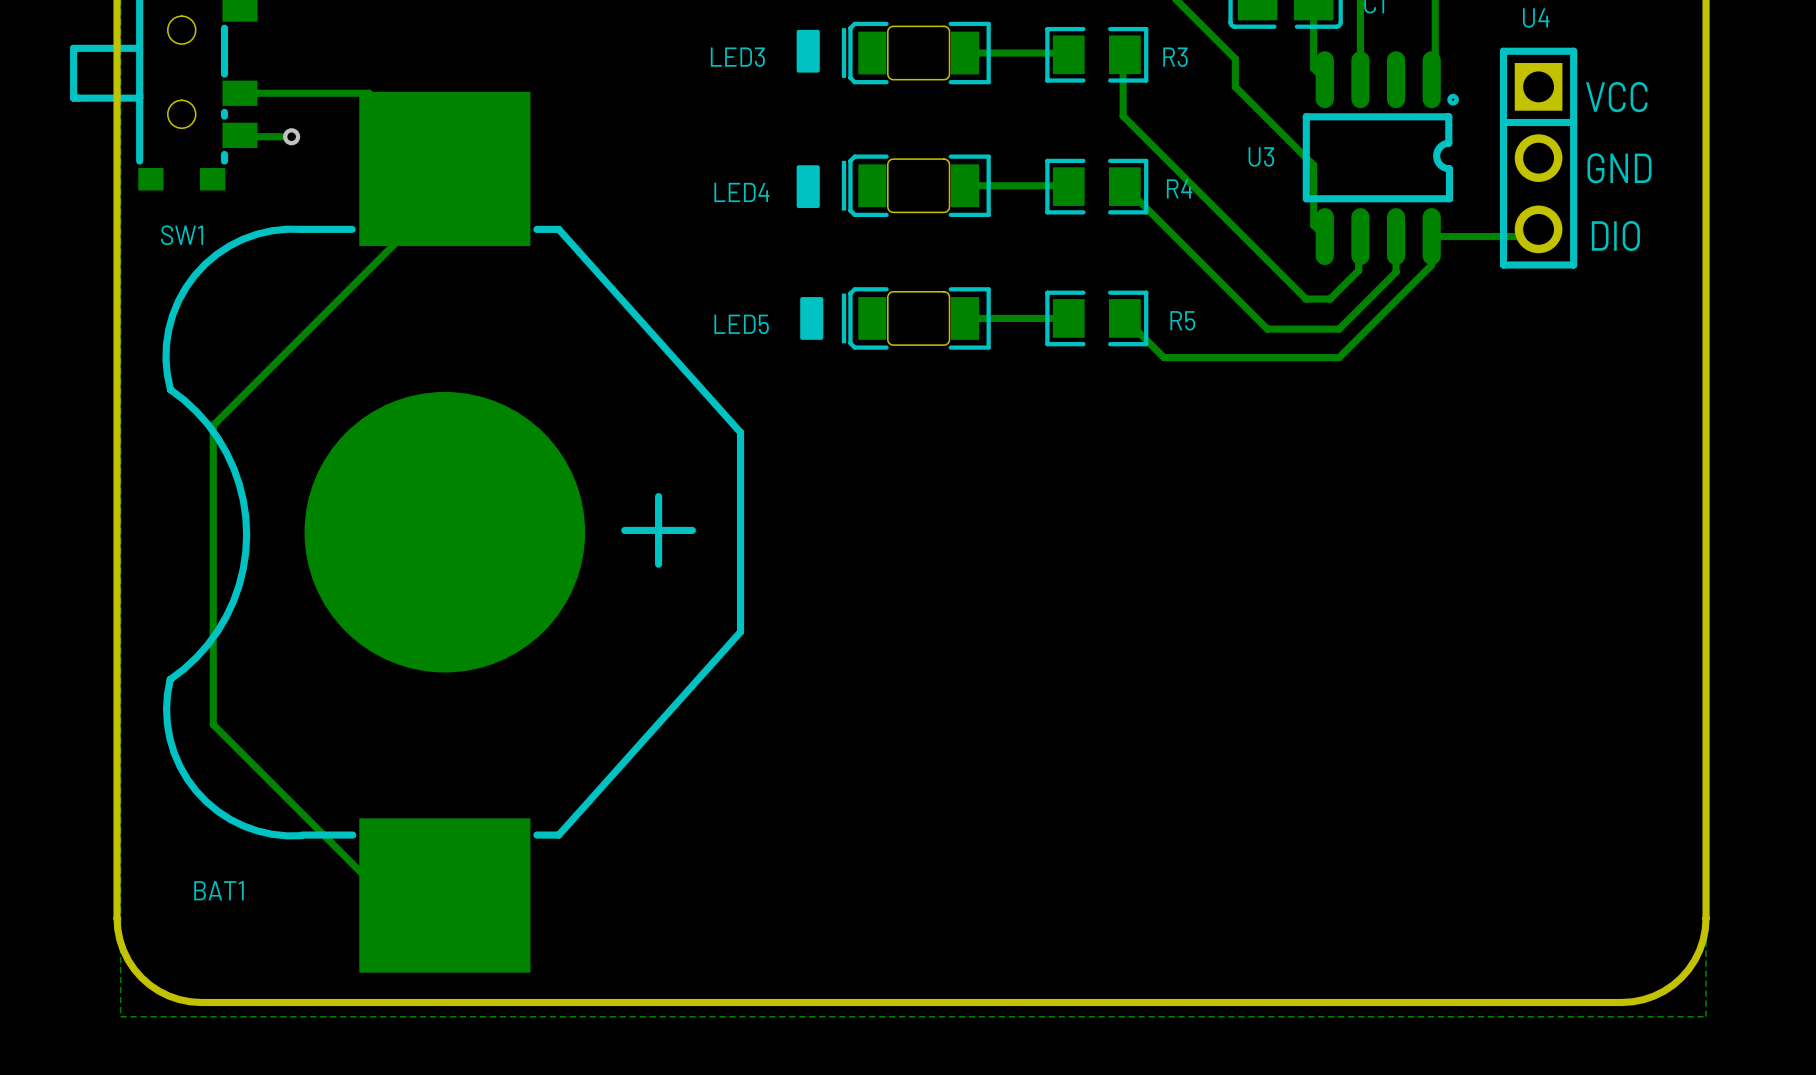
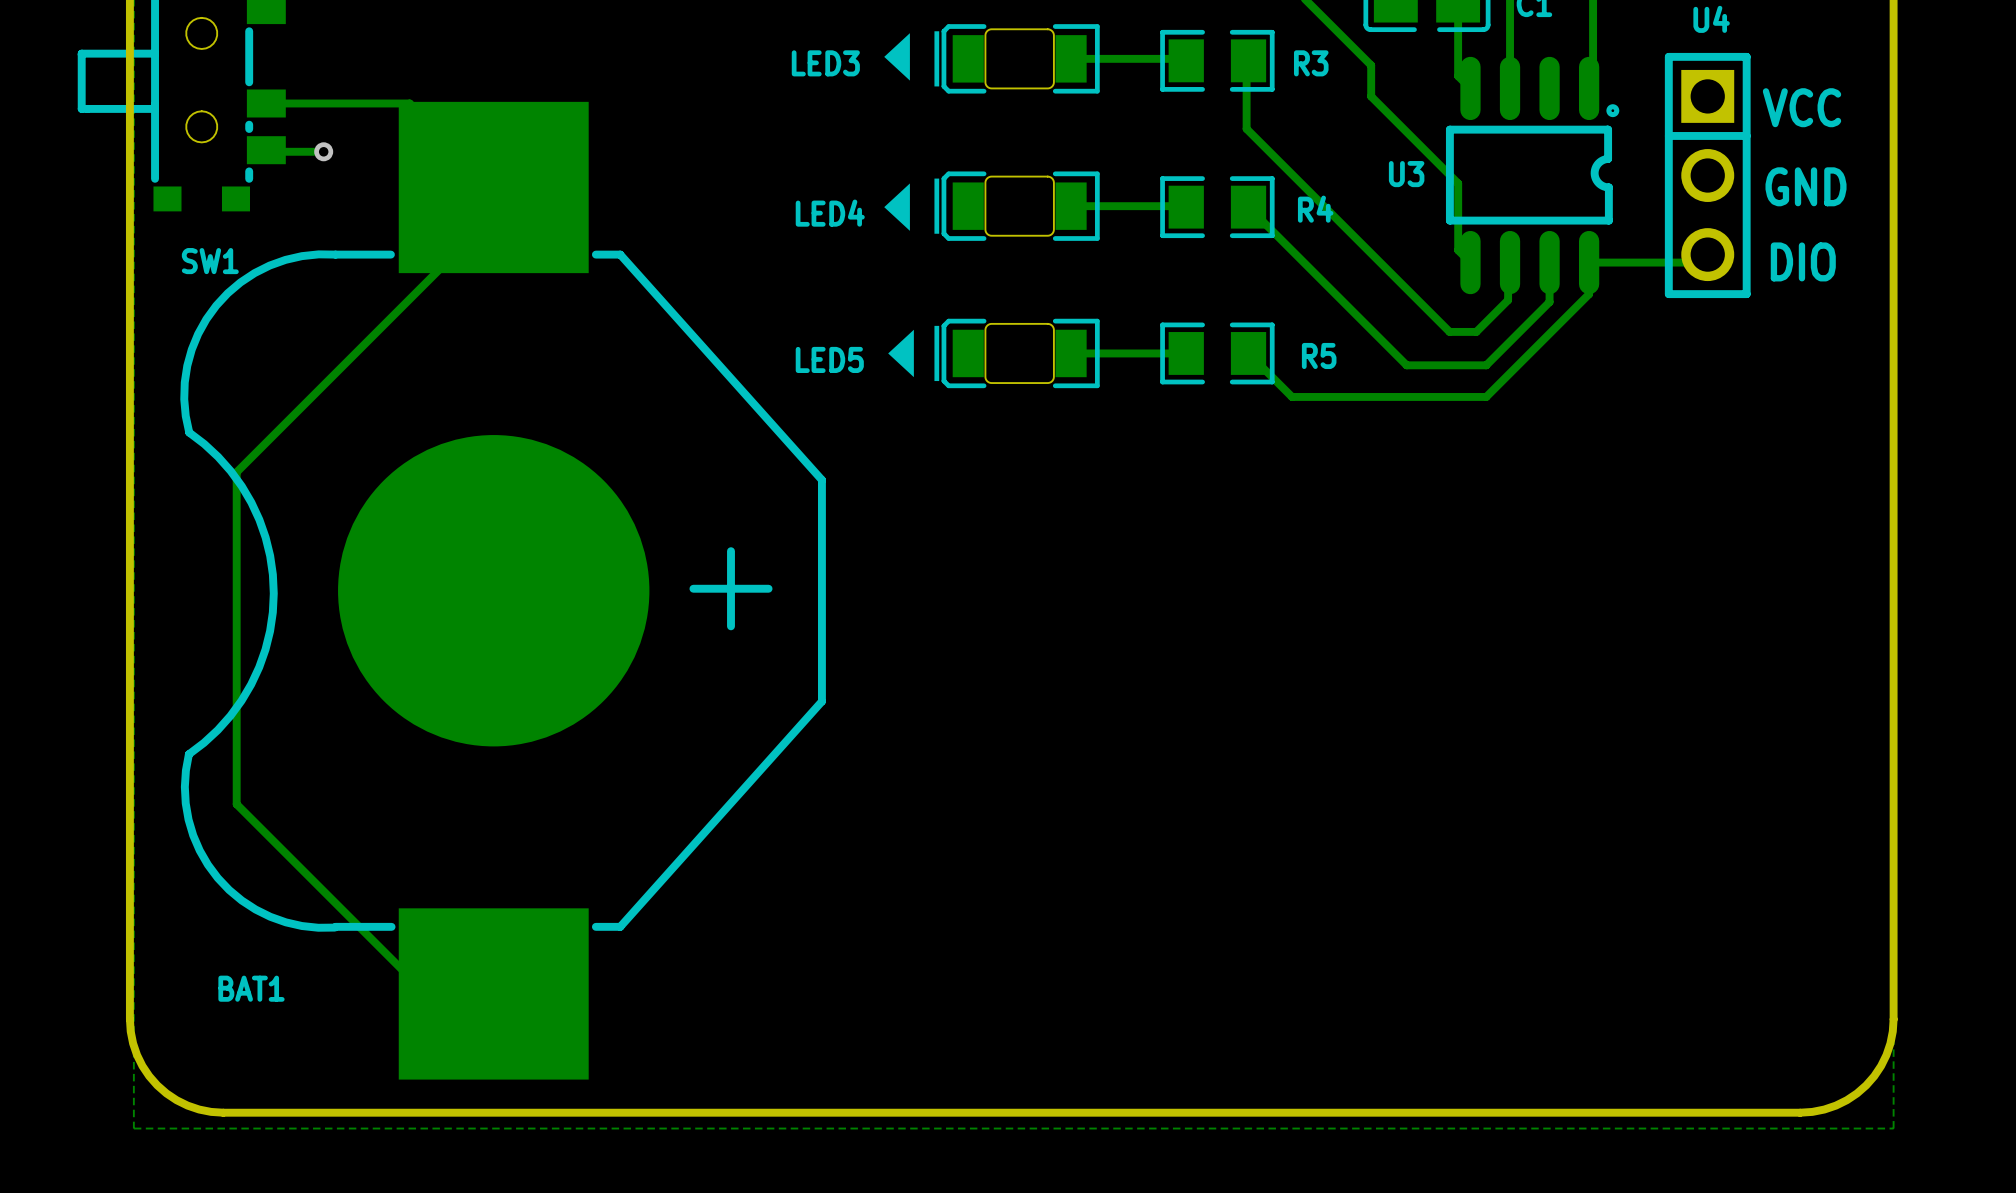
drawing shape: [796, 29, 820, 73] -> [884, 33, 910, 81]
drawing shape: [796, 165, 820, 209] -> [884, 183, 910, 231]
drawing shape: [800, 297, 824, 340] -> [888, 329, 914, 378]

